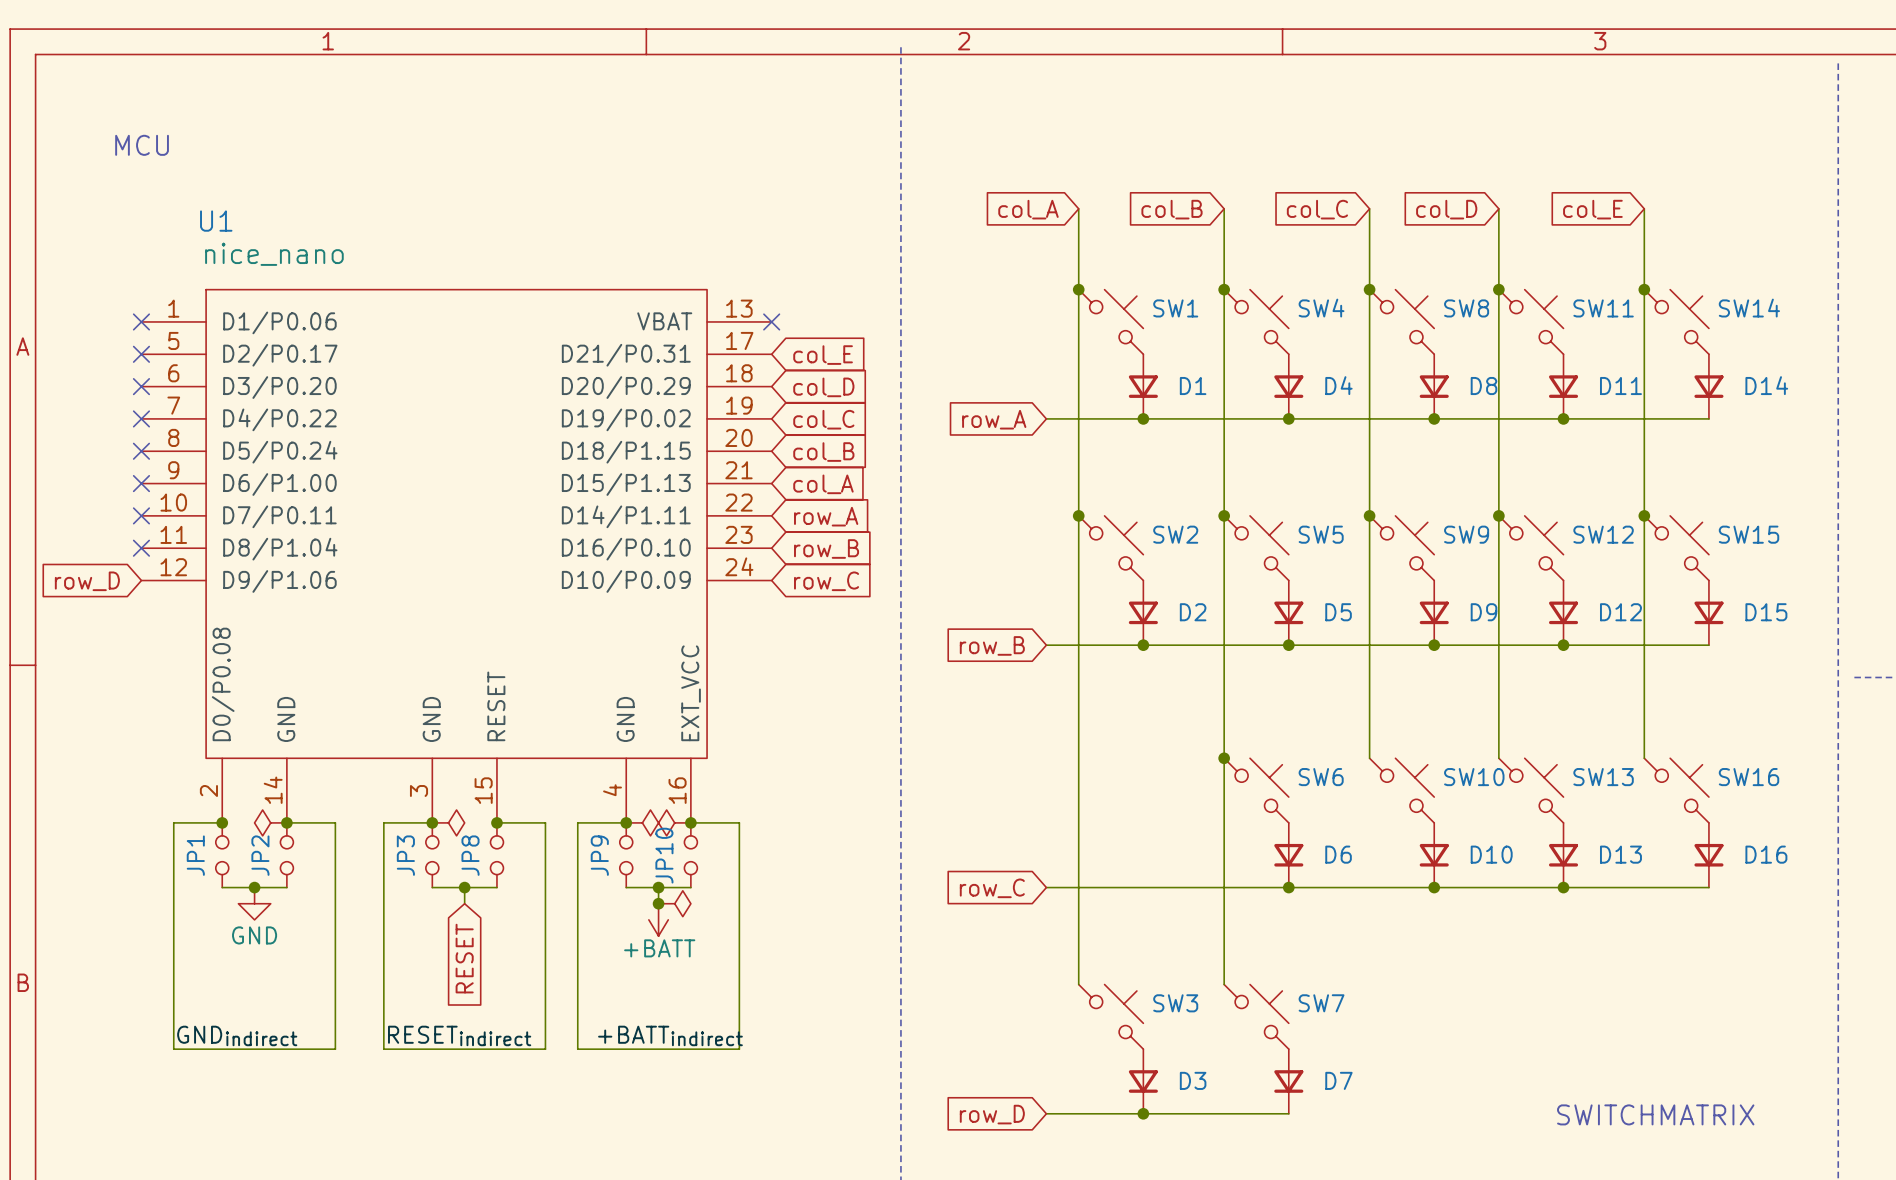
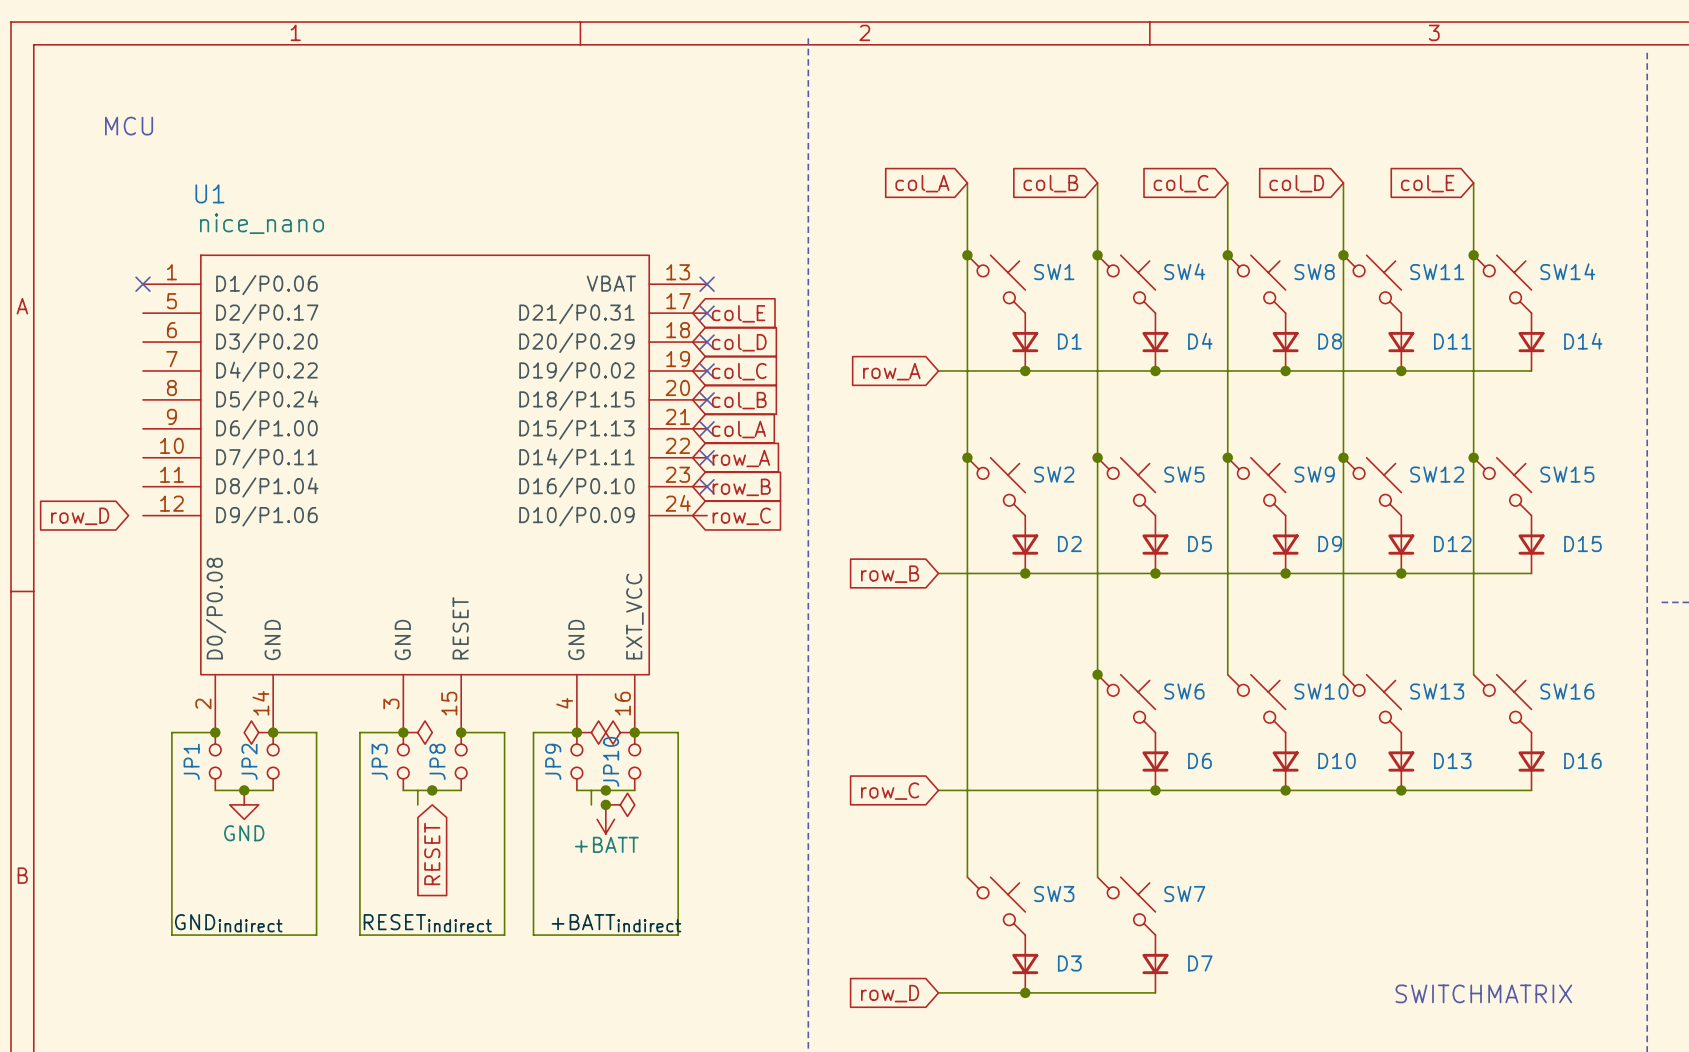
no-connect mark position: (141, 321) -> (142, 284)
no-connect mark position: (771, 321) -> (707, 284)
no-connect mark: (141, 354) -> none
no-connect mark: none -> (707, 313)
no-connect mark: (141, 386) -> none
no-connect mark: none -> (707, 342)
no-connect mark: (141, 418) -> none
no-connect mark: none -> (707, 370)
no-connect mark: (141, 451) -> none
no-connect mark: none -> (707, 399)
no-connect mark: (141, 483) -> none
no-connect mark: none -> (707, 428)
no-connect mark: (141, 515) -> none
no-connect mark: none -> (707, 457)
no-connect mark: (141, 548) -> none
no-connect mark: none -> (707, 486)
U1 position: (456, 556) -> (425, 493)
wire: (189, 822) (173, 822) (173, 1049) (189, 1049) -> (171, 732) (171, 935)
junction position: (222, 822) -> (215, 732)
power symbol position: (270, 822) -> (258, 732)
junction position: (286, 822) -> (273, 732)
wire: (335, 822) (335, 1049) -> (302, 732) (316, 732) (316, 935) (302, 935)
wire: (400, 822) (383, 822) (383, 1049) (400, 1049) -> (359, 732) (359, 935)
junction position: (432, 822) -> (403, 732)
power symbol position: (448, 822) -> (417, 732)
junction position: (496, 822) -> (461, 732)
wire: (545, 822) (545, 1049) -> (490, 732) (504, 732) (504, 935) (490, 935)
wire: (593, 822) (577, 822) (577, 1049) (593, 1049) -> (533, 732) (533, 935)
junction position: (626, 822) -> (576, 732)
power symbol: (642, 822) -> none
power symbol: none -> (591, 732)
power symbol: (674, 822) -> none
junction position: (690, 822) -> (634, 732)
power symbol: none -> (620, 732)
wire: (739, 822) (739, 1049) -> (663, 732) (678, 732) (678, 935) (663, 935)
JP1 position: (222, 855) -> (215, 761)
JP2 position: (286, 855) -> (273, 761)
JP3 position: (432, 855) -> (403, 761)
JP8 position: (496, 855) -> (461, 761)
JP9 position: (626, 855) -> (576, 761)
JP10 position: (690, 855) -> (634, 761)
wire: (222, 887) (238, 887) -> (258, 790) (273, 790)
junction position: (254, 887) -> (244, 790)
wire: (432, 887) (448, 887) -> (446, 790) (461, 790)
junction position: (464, 887) -> (432, 790)
wire: (626, 887) (642, 887) -> (620, 790) (634, 790)
junction: (658, 887) -> none
junction: none -> (605, 790)
power symbol position: GND (254, 903) -> GND (244, 804)
junction: (658, 903) -> none
junction: none -> (605, 804)
power symbol position: (674, 903) -> (620, 804)
power symbol position: +BATT (658, 919) -> +BATT (605, 819)
global label position: RESET (464, 958) -> RESET (432, 853)
label position: GNDindirect (237, 1035) -> GNDindirect (228, 923)
label position: RESETindirect (459, 1035) -> RESETindirect (427, 923)
label position: +BATTindirect (670, 1035) -> +BATTindirect (616, 923)

